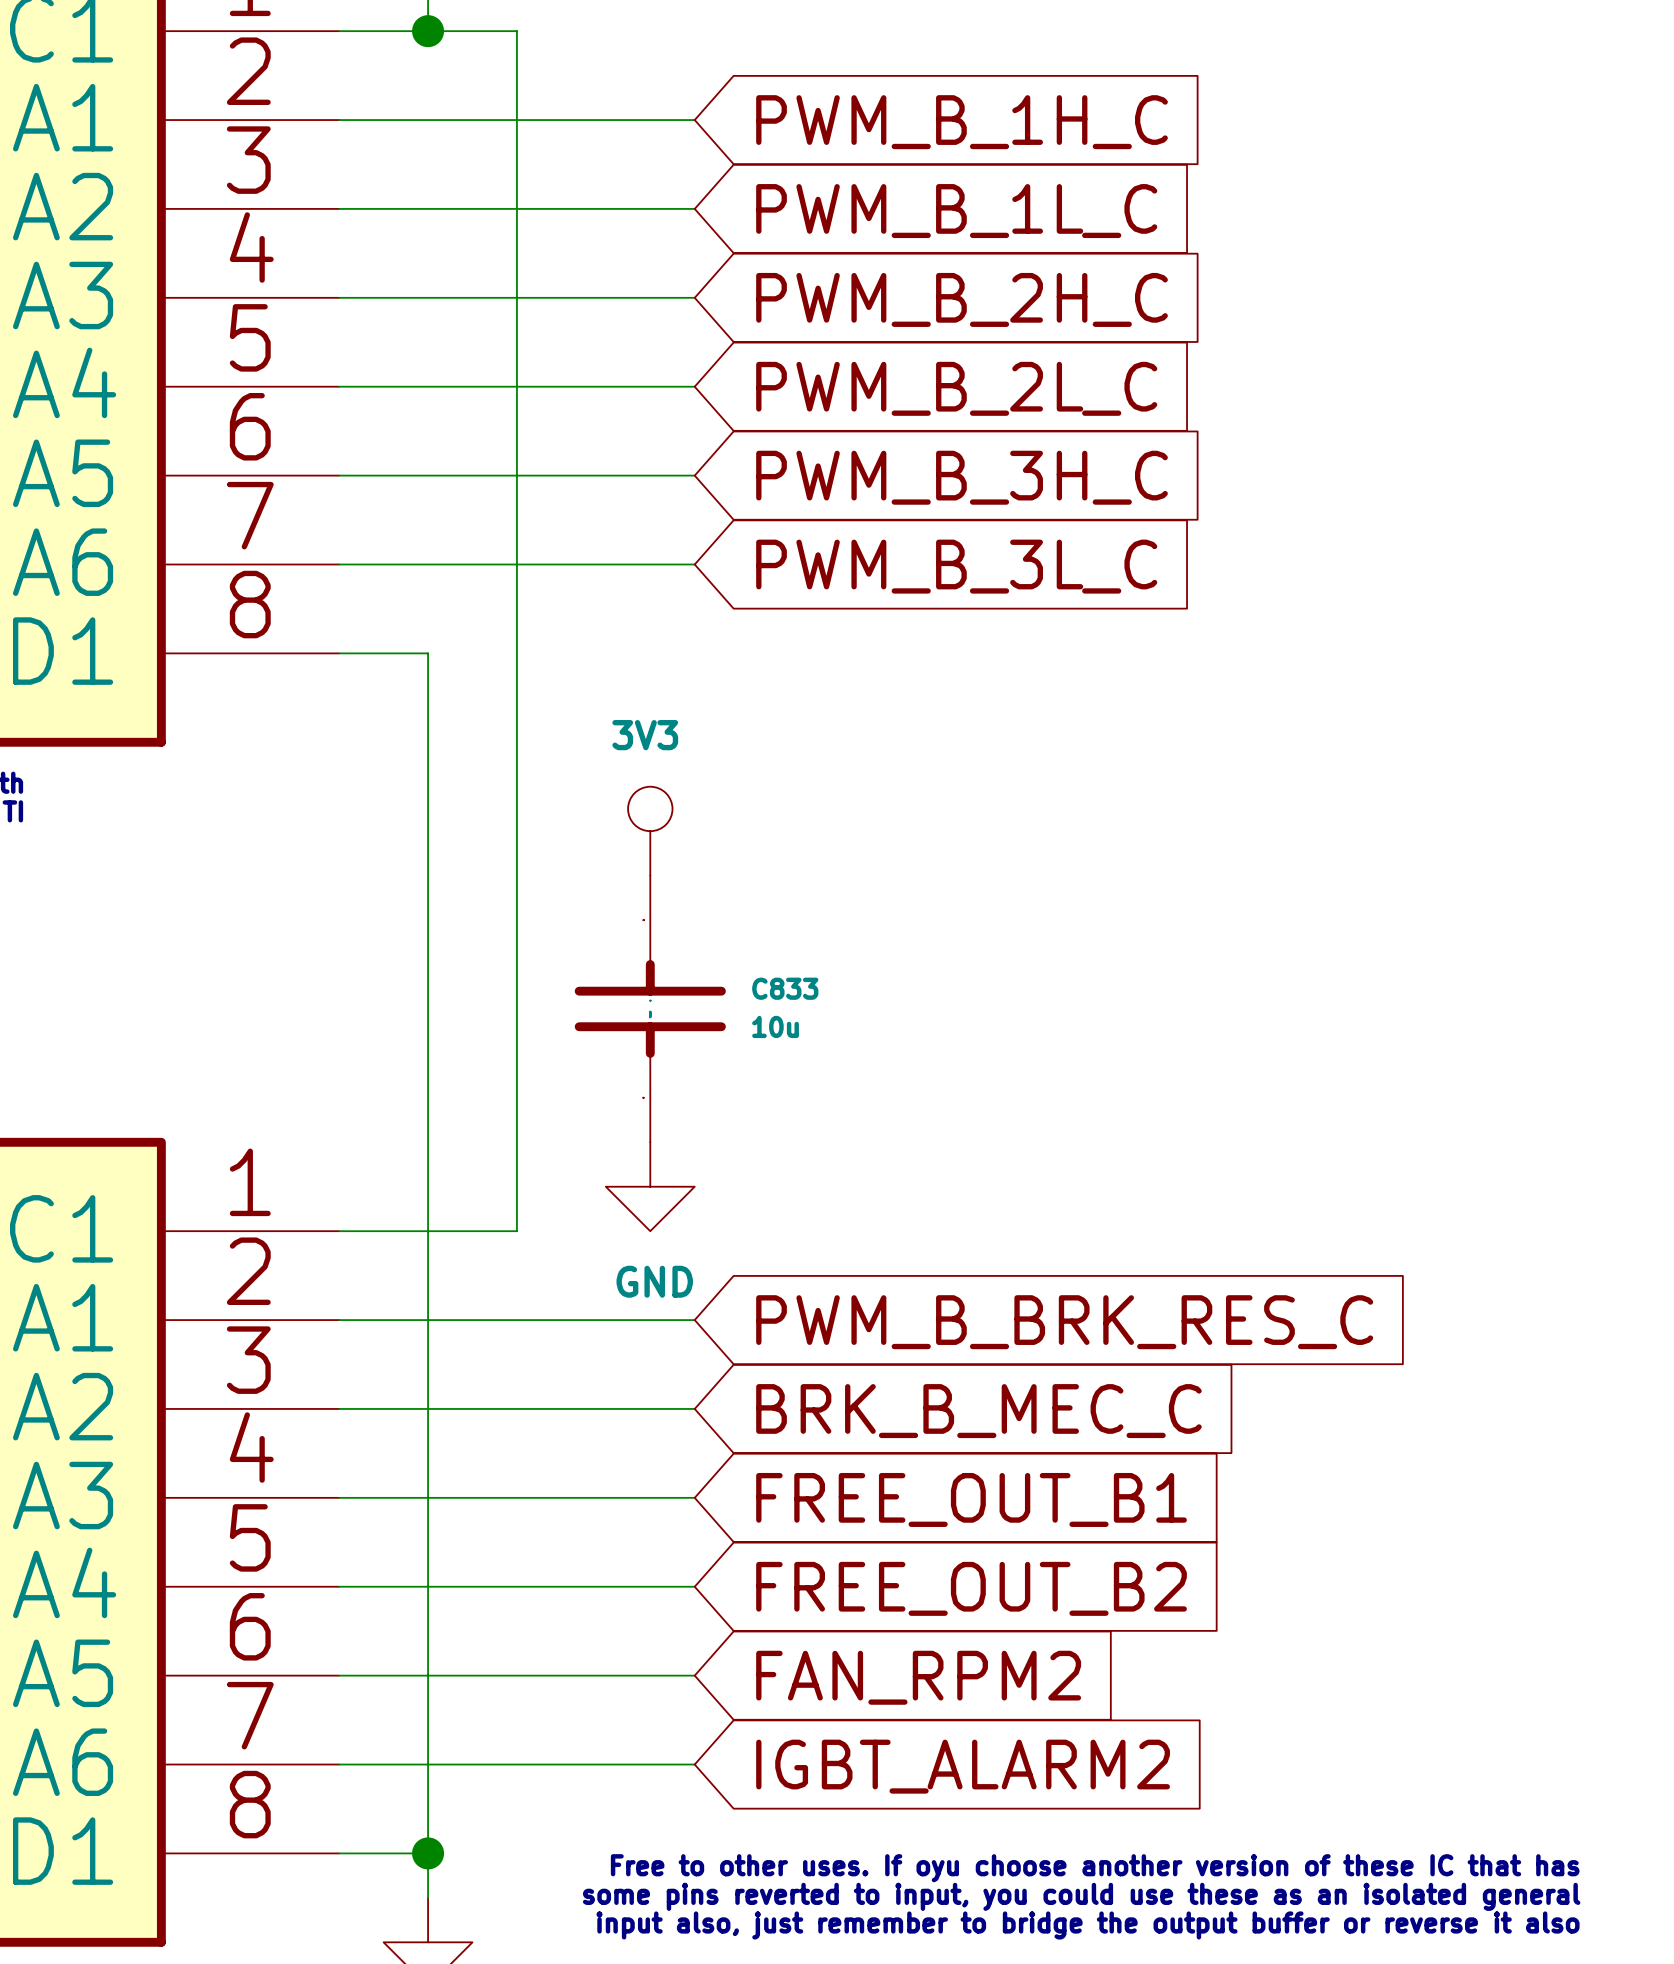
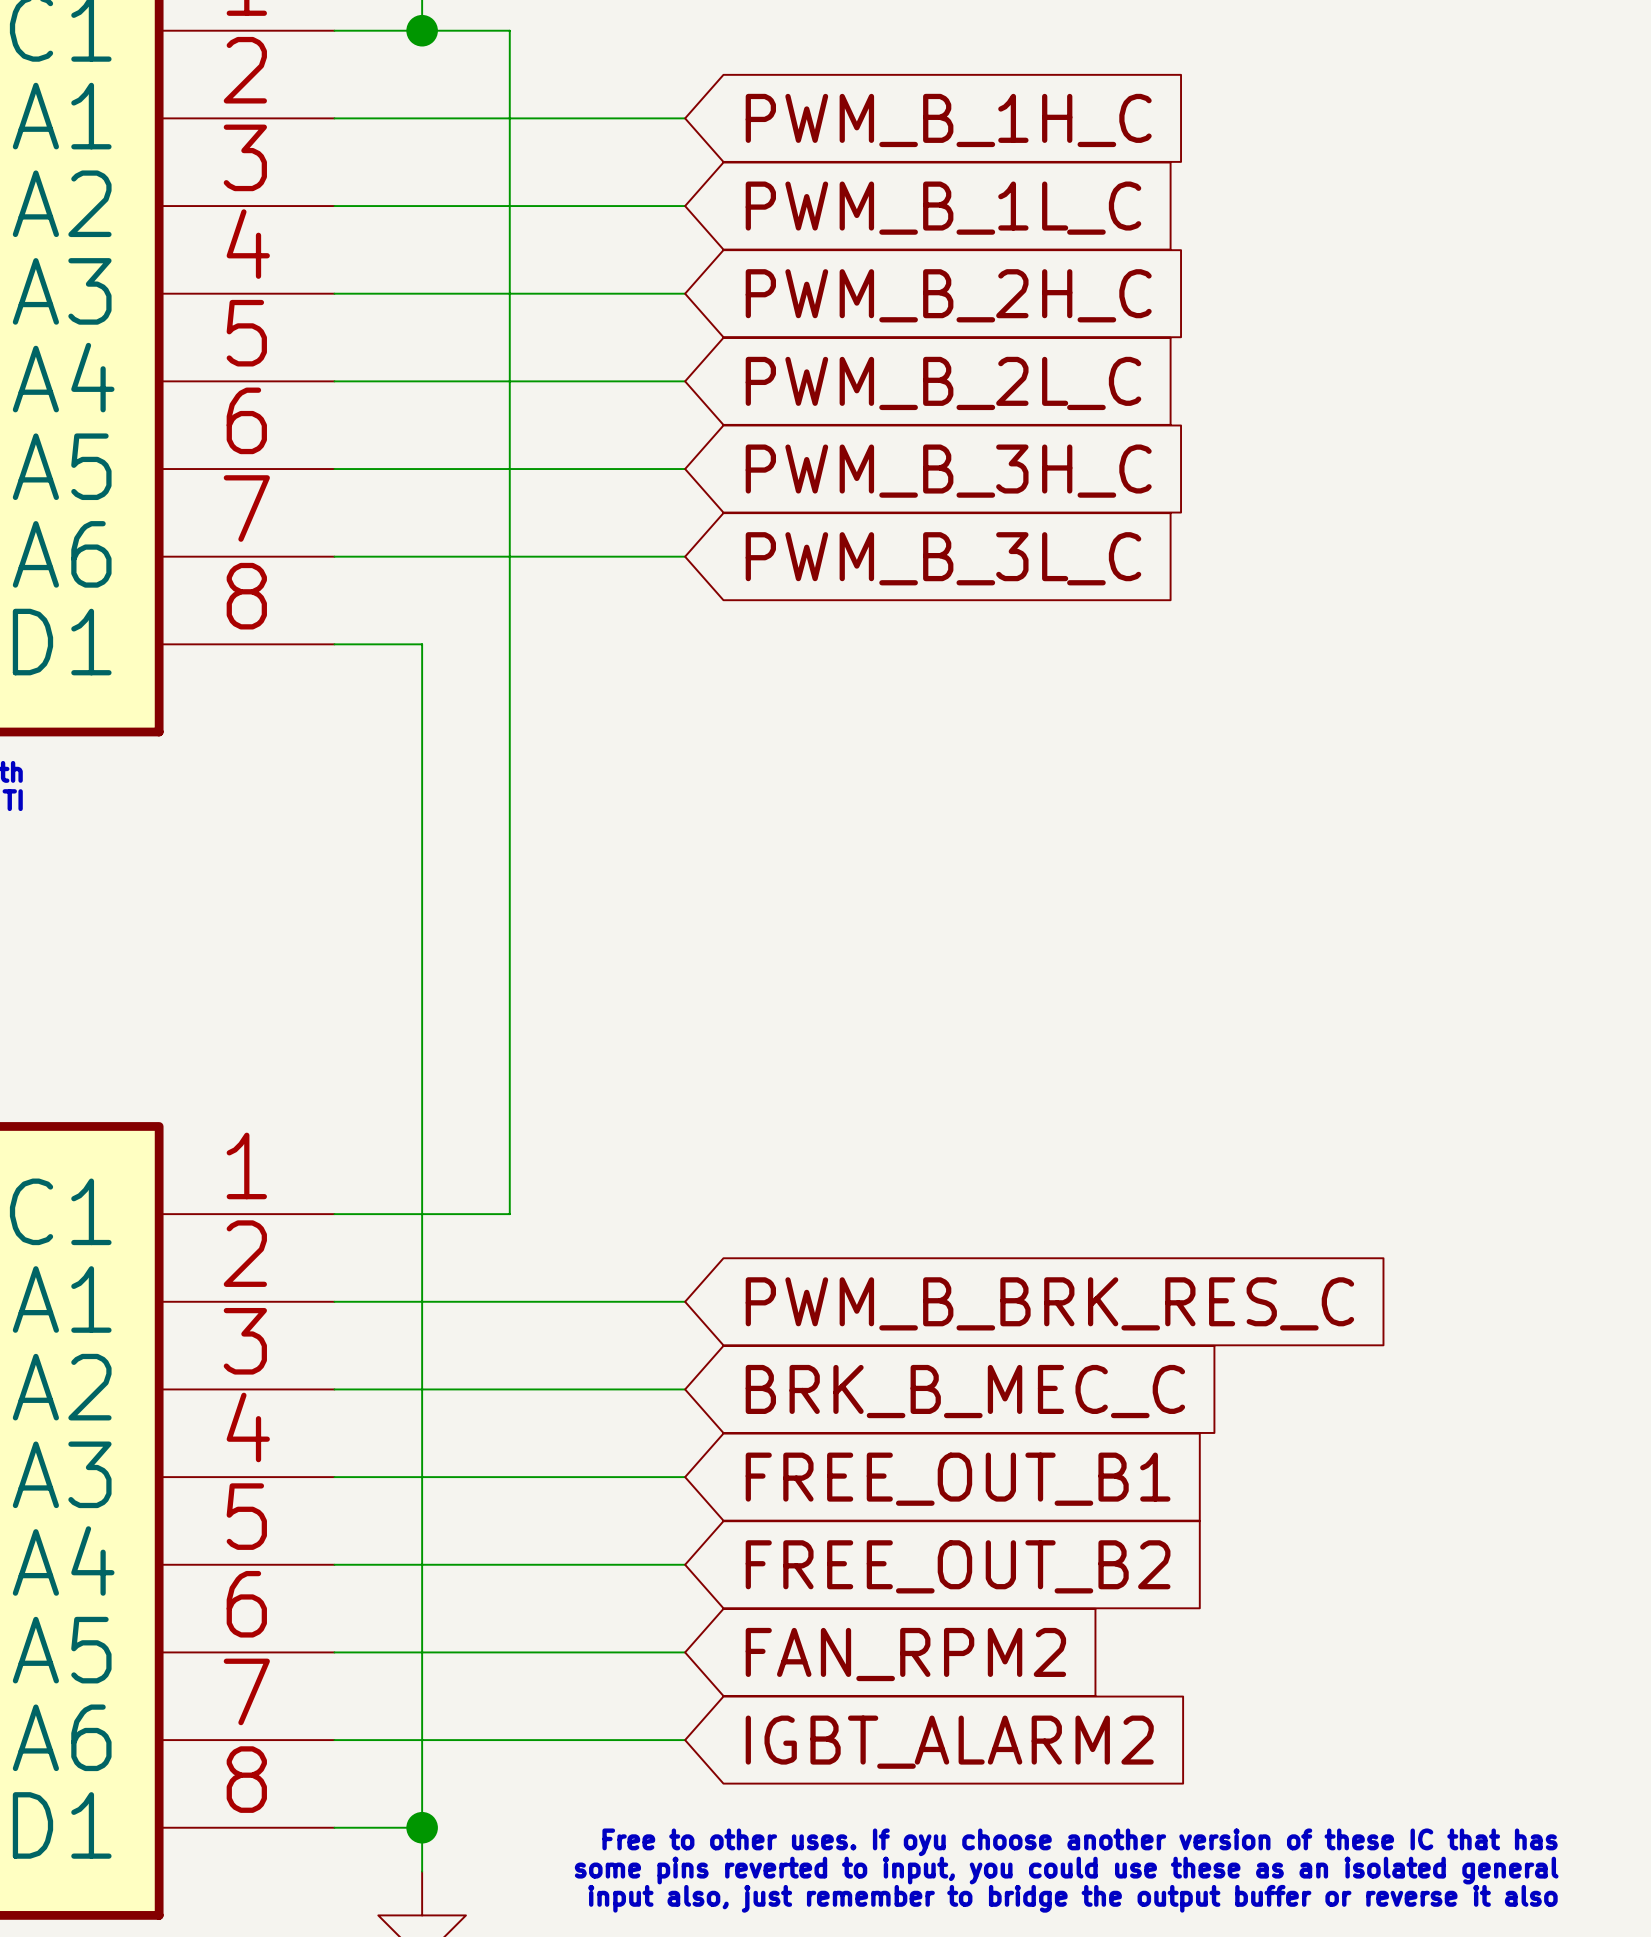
power symbol: 3V3 (650, 831) -> none
C833: 10u (650, 1008) -> none
power symbol: GND (650, 1186) -> none

